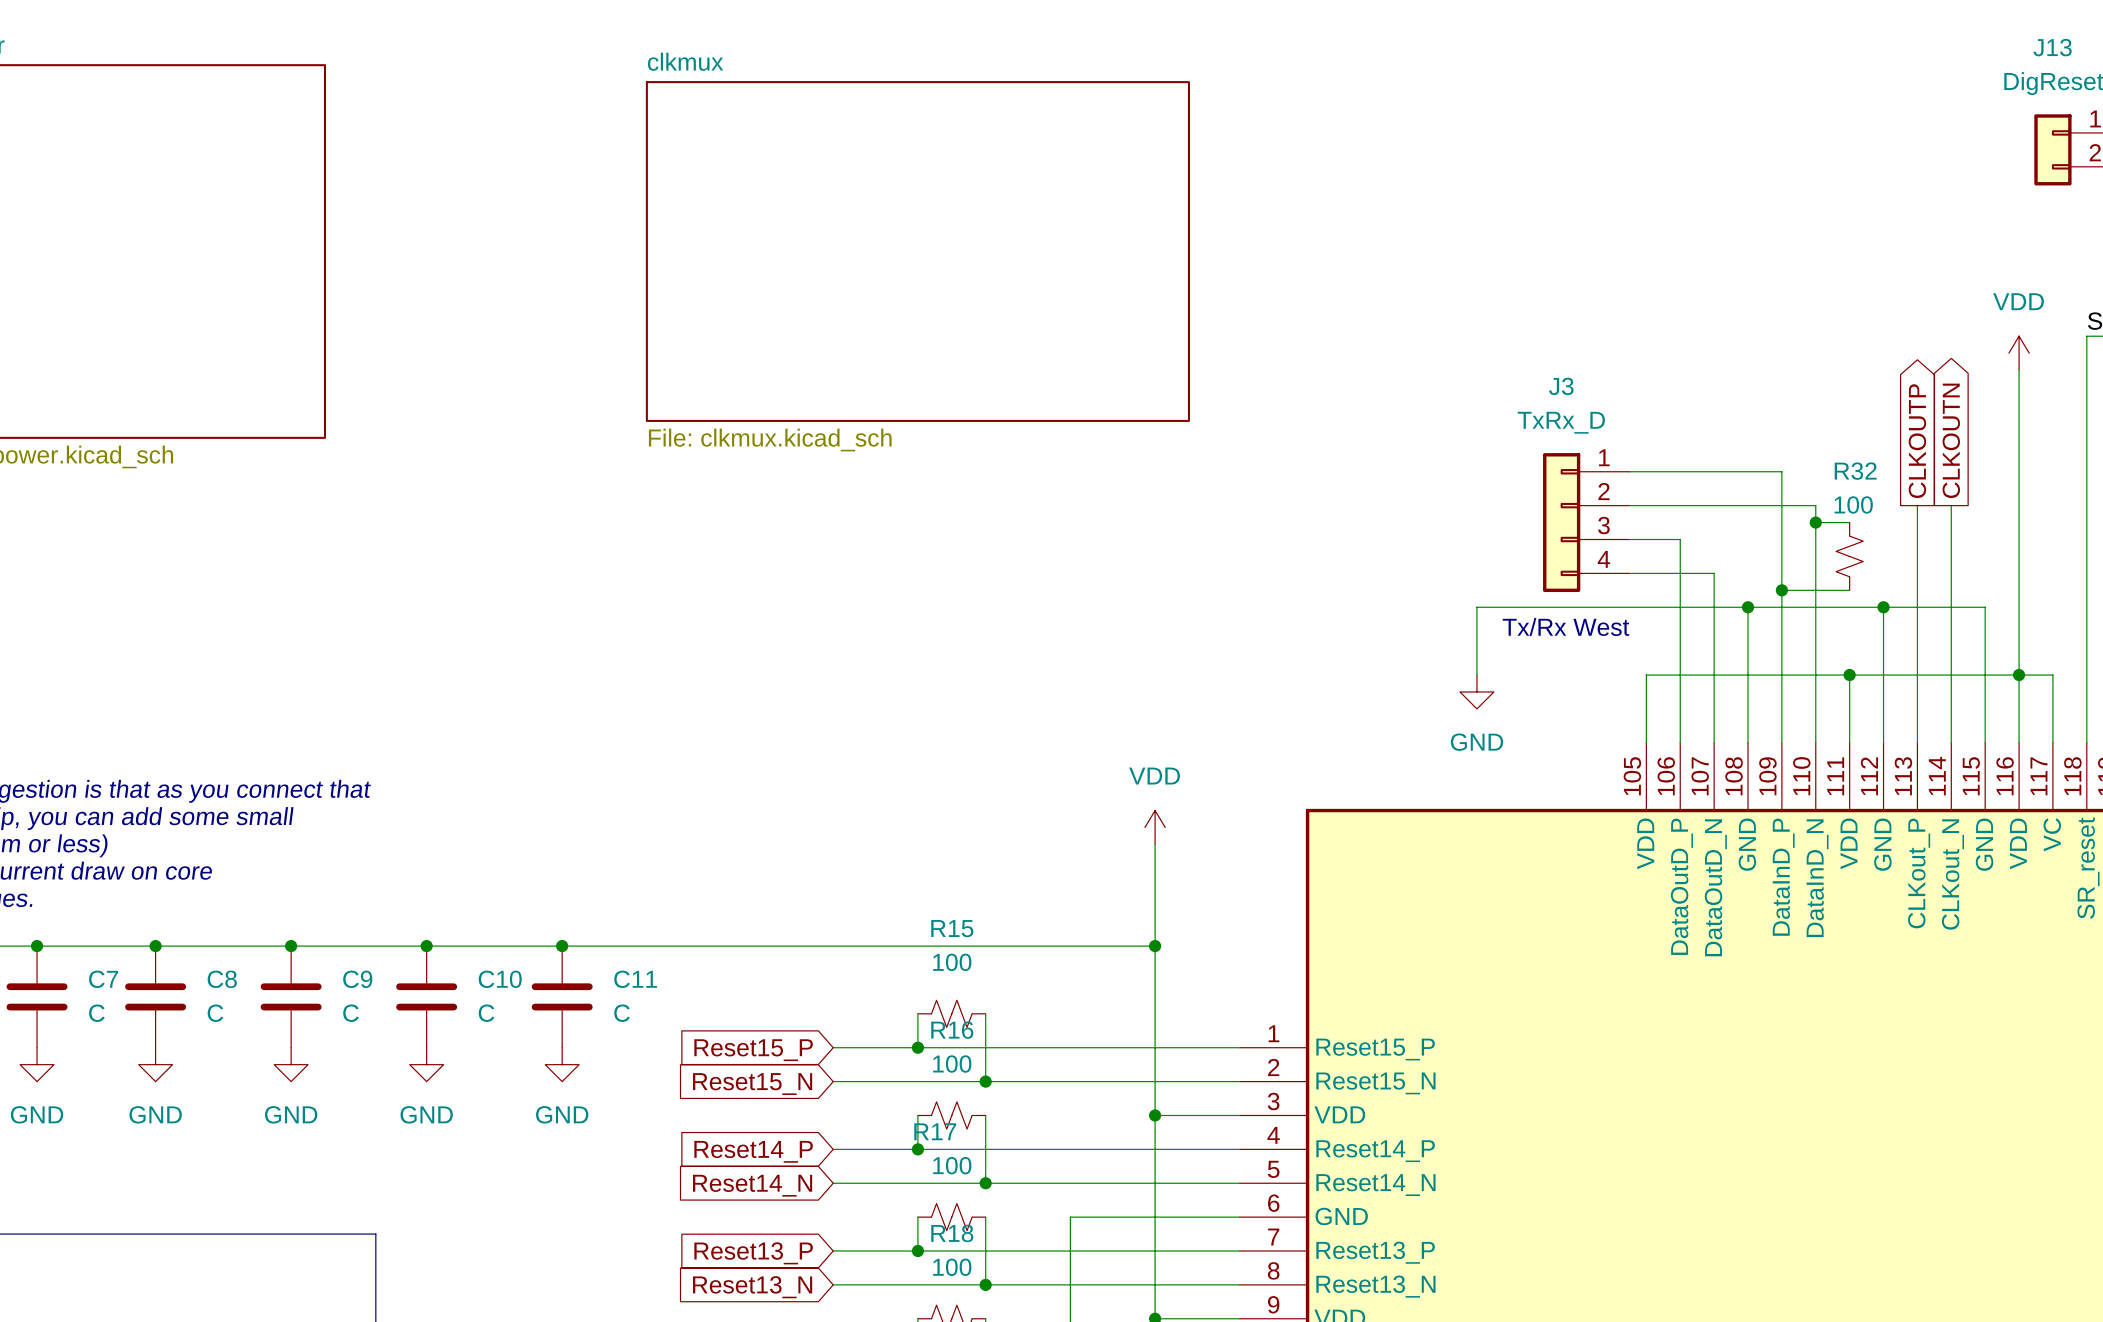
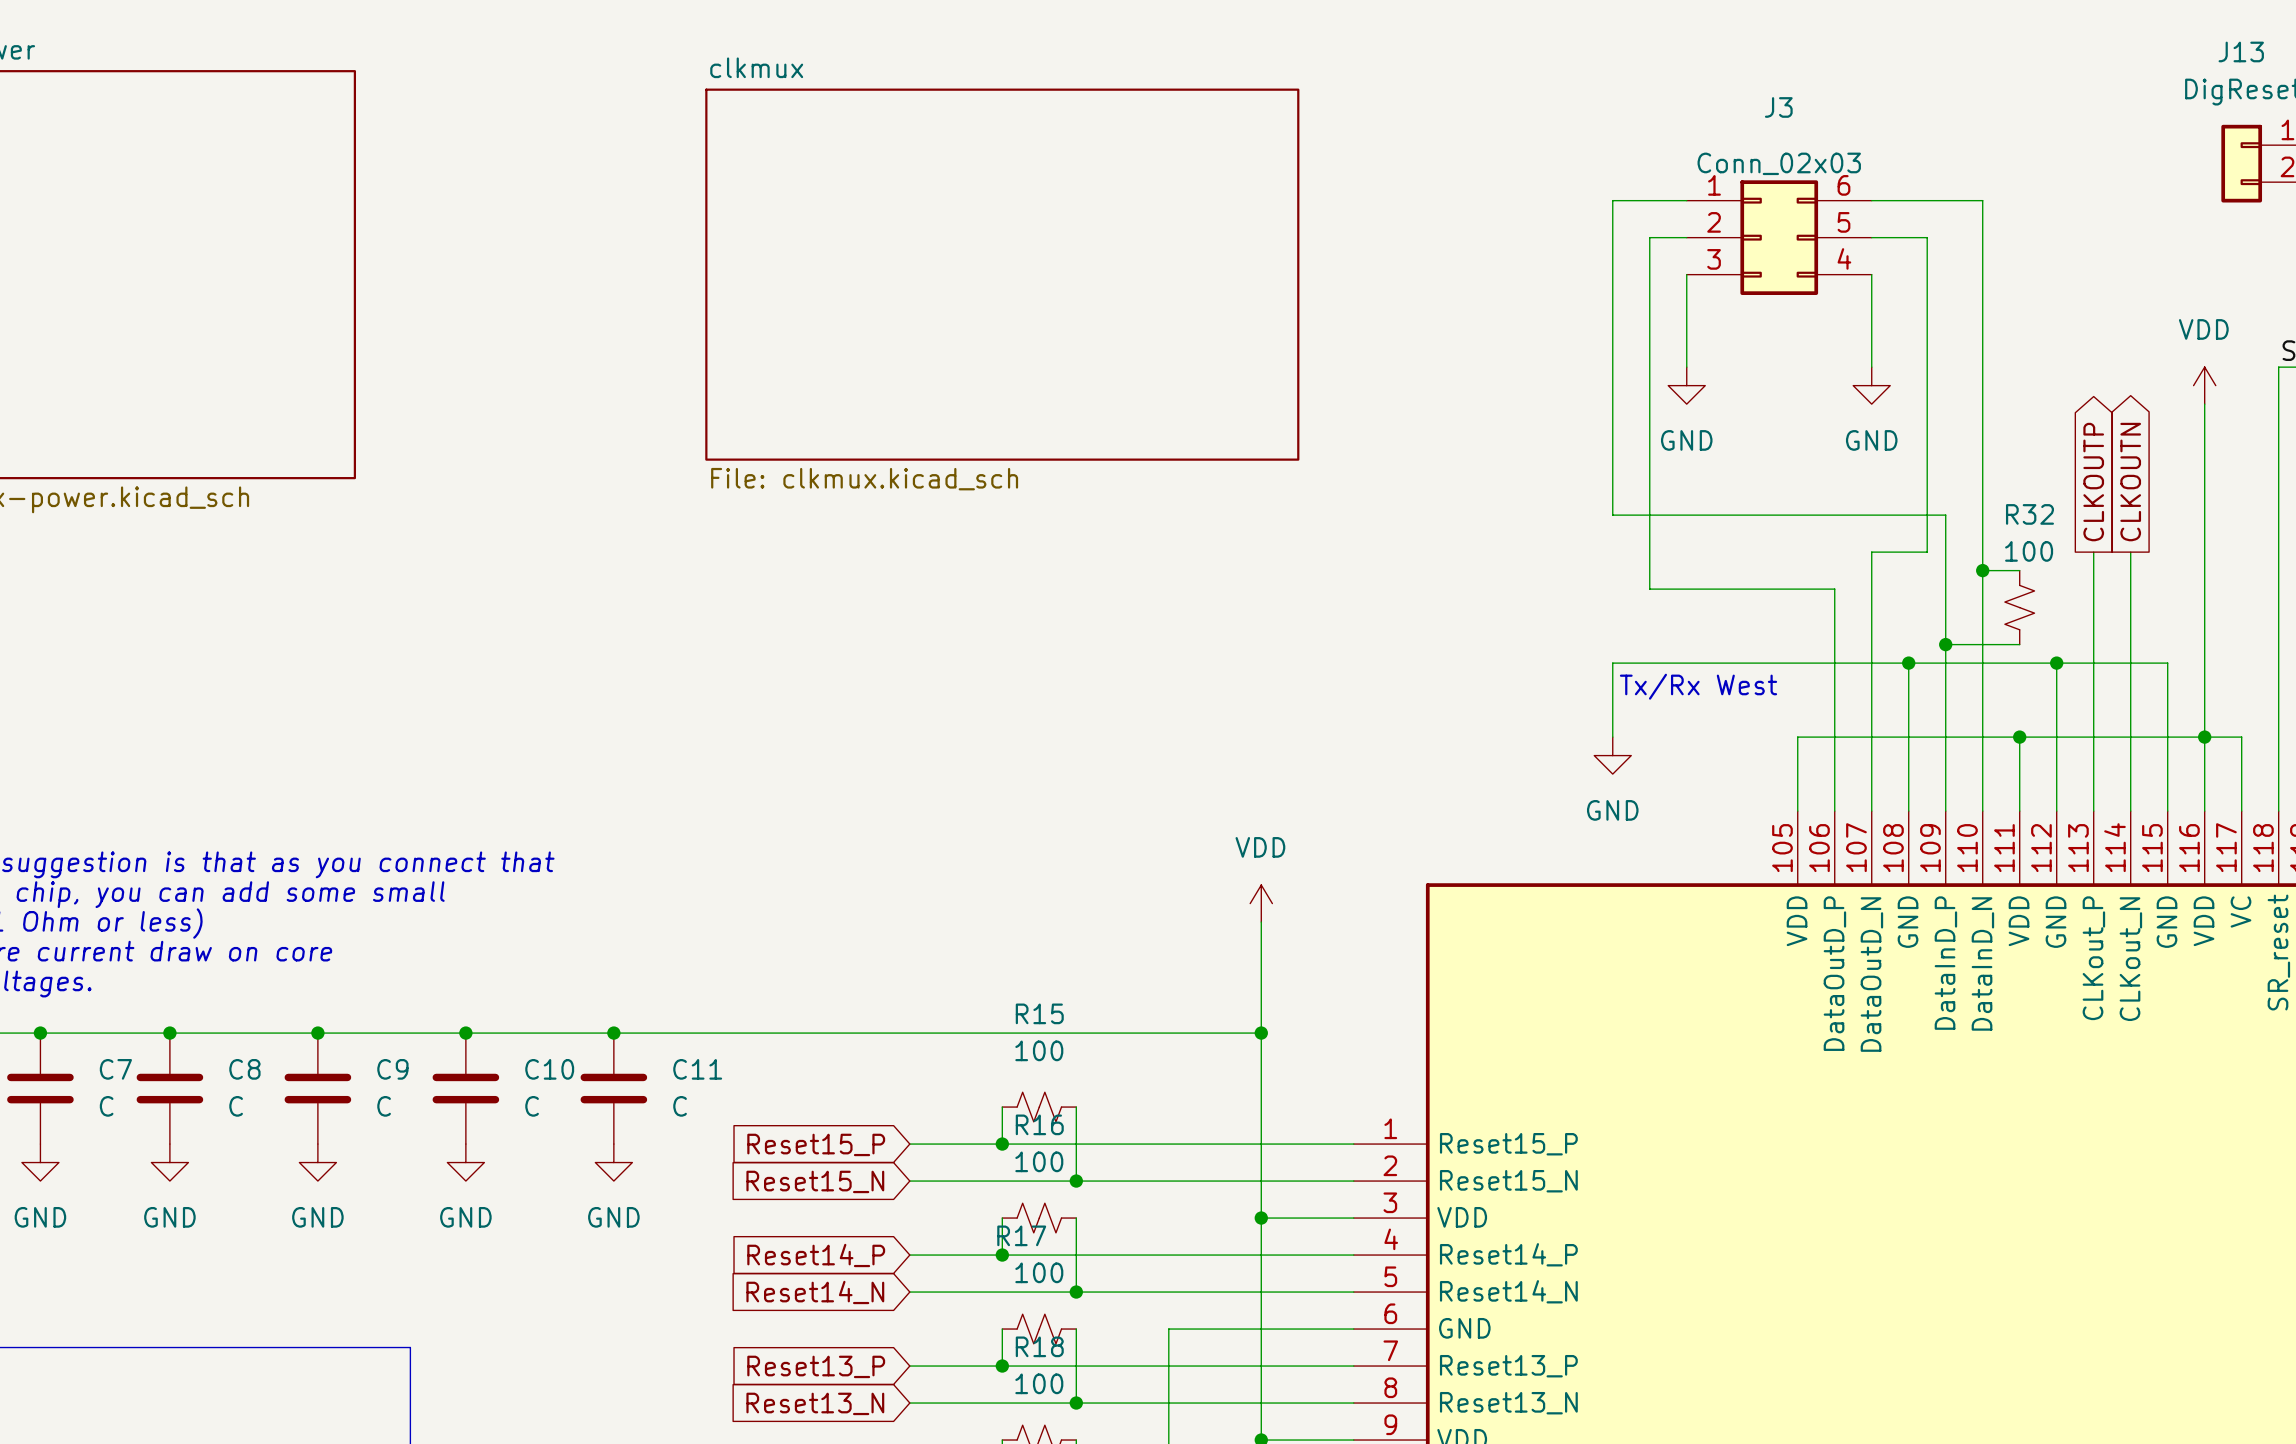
wire: none -> (1686, 200) (1612, 200) (1612, 515) (1779, 515)
wire: none -> (1871, 200) (1982, 200) (1982, 552)
wire: none -> (1686, 237) (1649, 237) (1649, 589) (1779, 589)
wire: none -> (1686, 274) (1686, 367)
wire: none -> (1871, 274) (1871, 367)
power symbol: none -> GND (1686, 385)
power symbol: none -> GND (1871, 385)
J3 name position: J3 (1561, 386) -> J3 (1778, 107)
J3 value: TxRx_D (1561, 422) -> Conn_02x03 (1779, 163)
J3 symbol: [1543, 453, 1630, 593] -> [1686, 180, 1872, 295]
wire: (1629, 505) (1714, 505) -> (1871, 626) (1871, 552)
wire: (1764, 505) (1815, 505) -> (1927, 552) (1927, 237) (1871, 237)
wire: (1629, 573) (1714, 573) -> none

